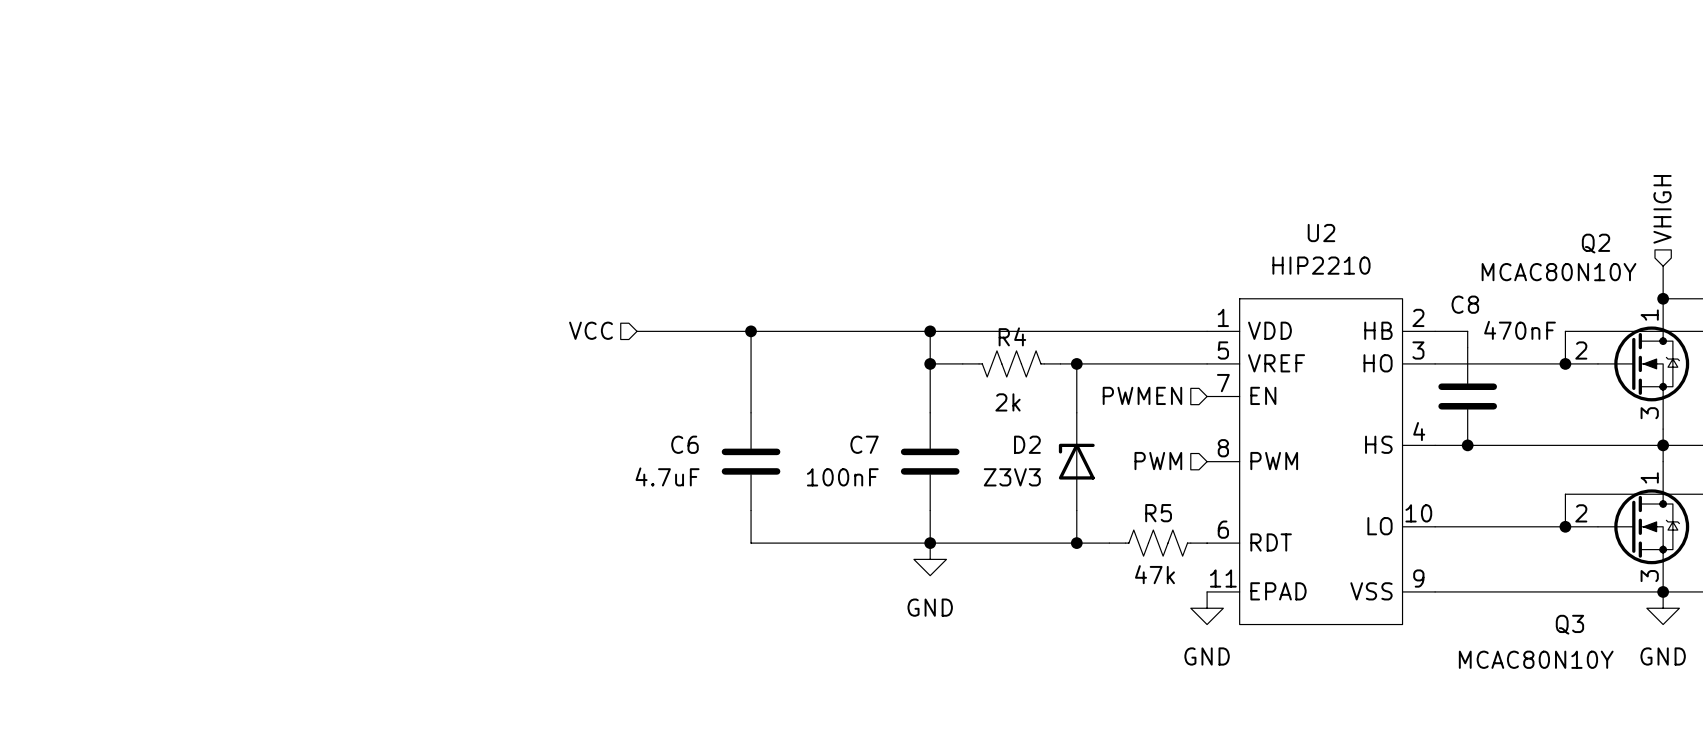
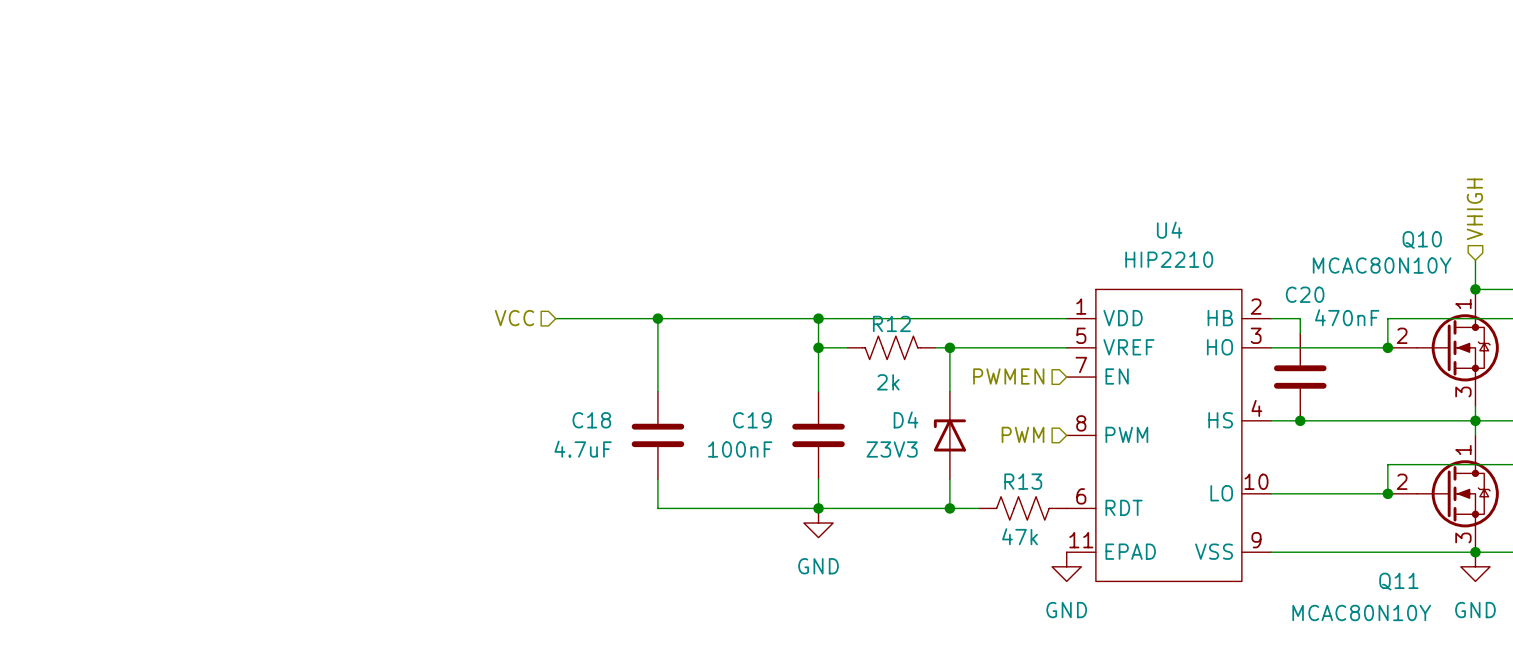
U2 name: U2 (1321, 233) -> U4 (1169, 230)
Q2 name: Q2 (1596, 243) -> Q10 (1422, 239)
C8 name: C8 (1465, 304) -> C20 (1305, 294)
R4 name: R4 (1012, 336) -> R12 (891, 323)
C6 name: C6 (684, 444) -> C18 (591, 420)
C7 name: C7 (864, 444) -> C19 (752, 420)
D2 name: D2 (1027, 444) -> D4 (906, 419)
R5 name: R5 (1158, 513) -> R13 (1023, 481)
Q3 name: Q3 (1569, 624) -> Q11 (1398, 581)

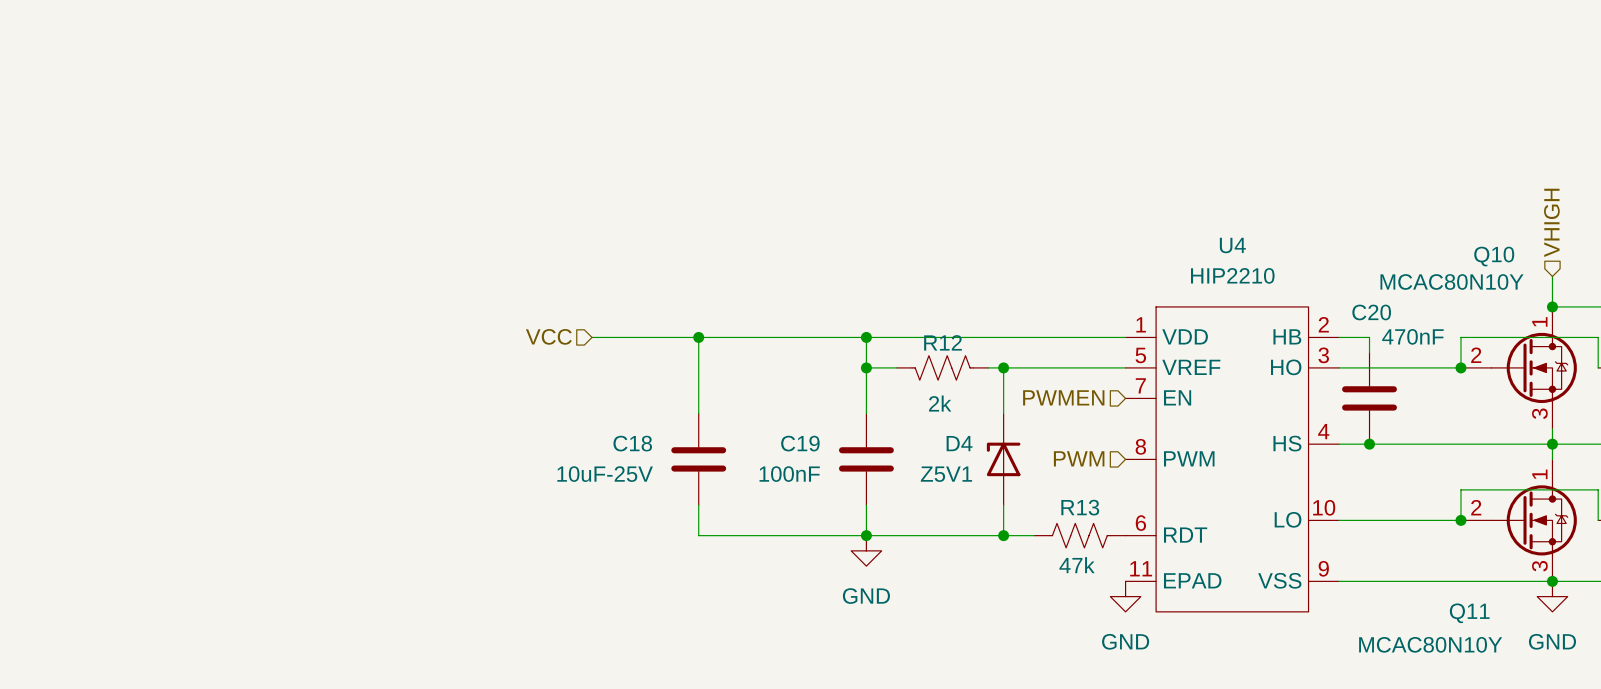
C18 value: 4.7uF (583, 449) -> 10uF-25V (605, 474)
D4 value: Z3V3 (892, 449) -> Z5V1 (946, 474)

